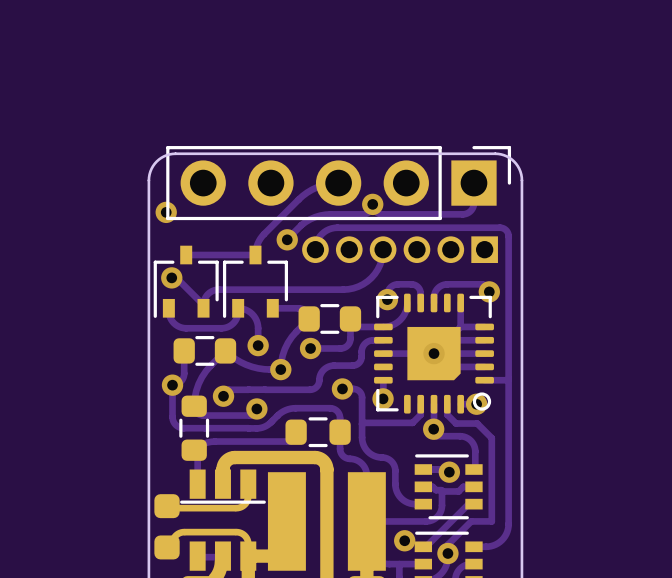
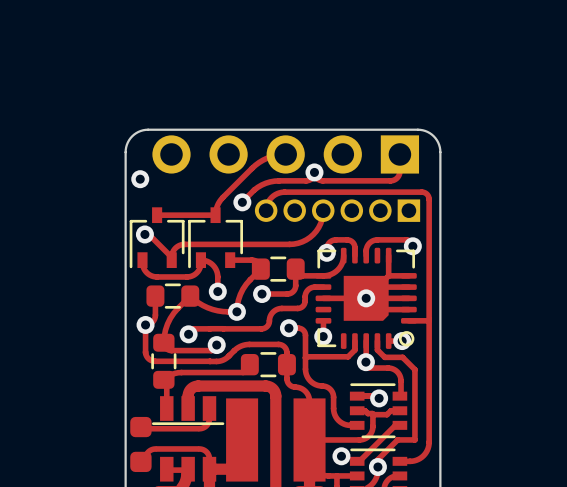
part footprint: [166, 146, 512, 221] -> [152, 135, 420, 174]

